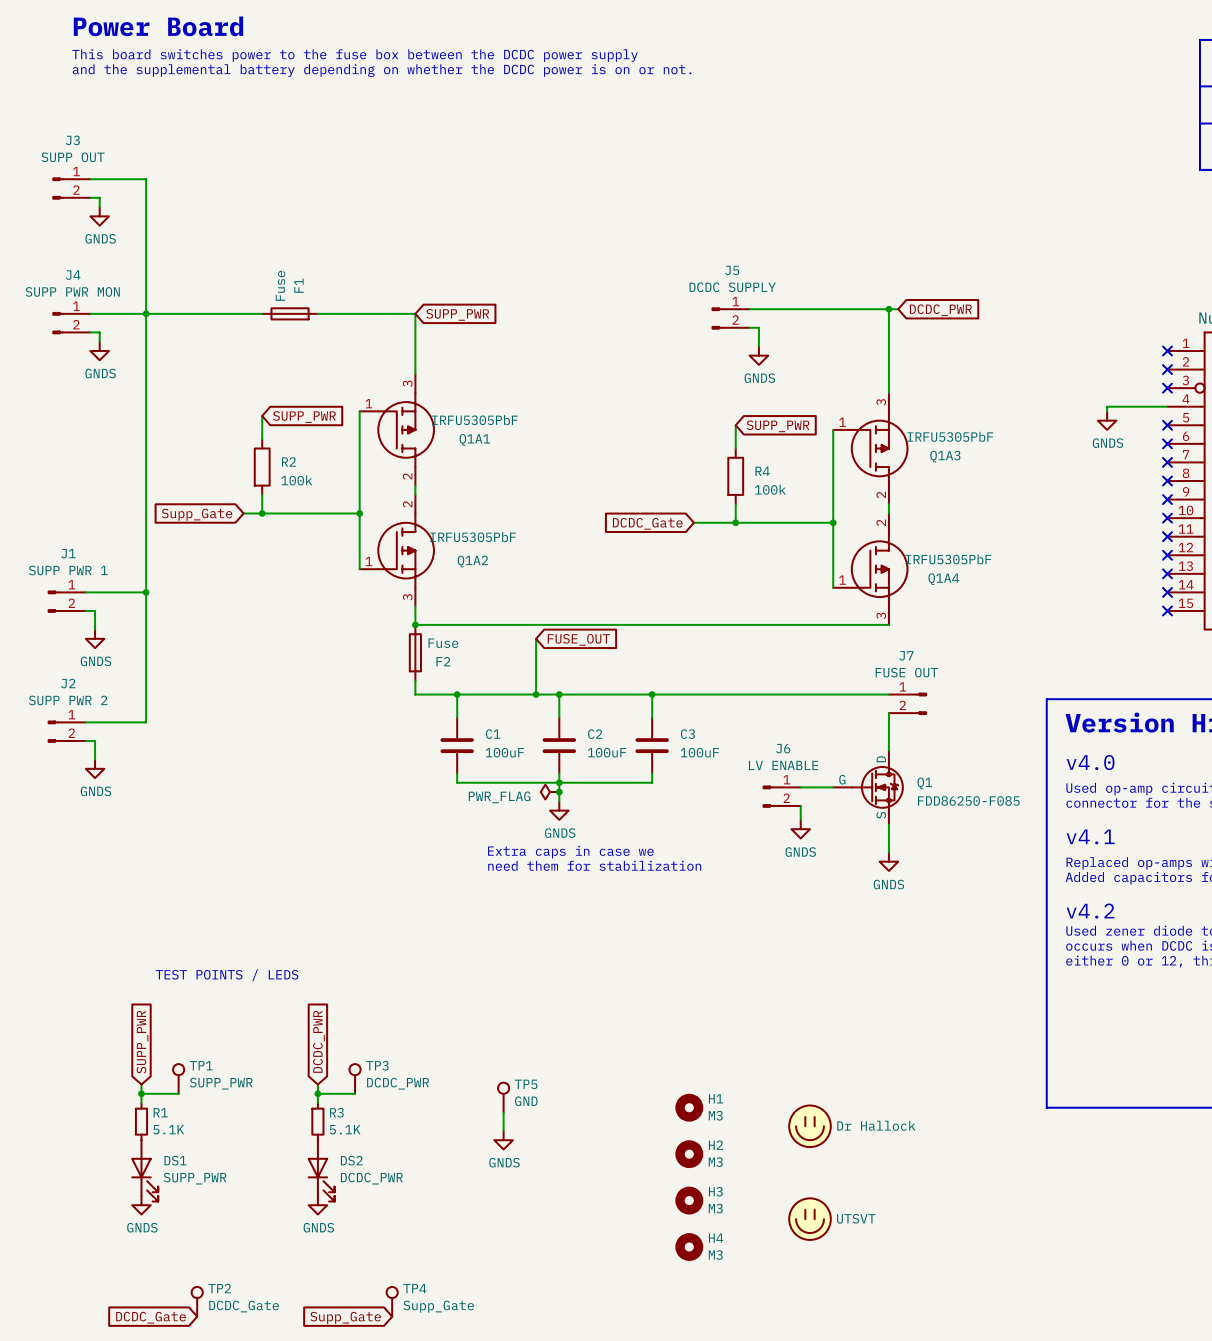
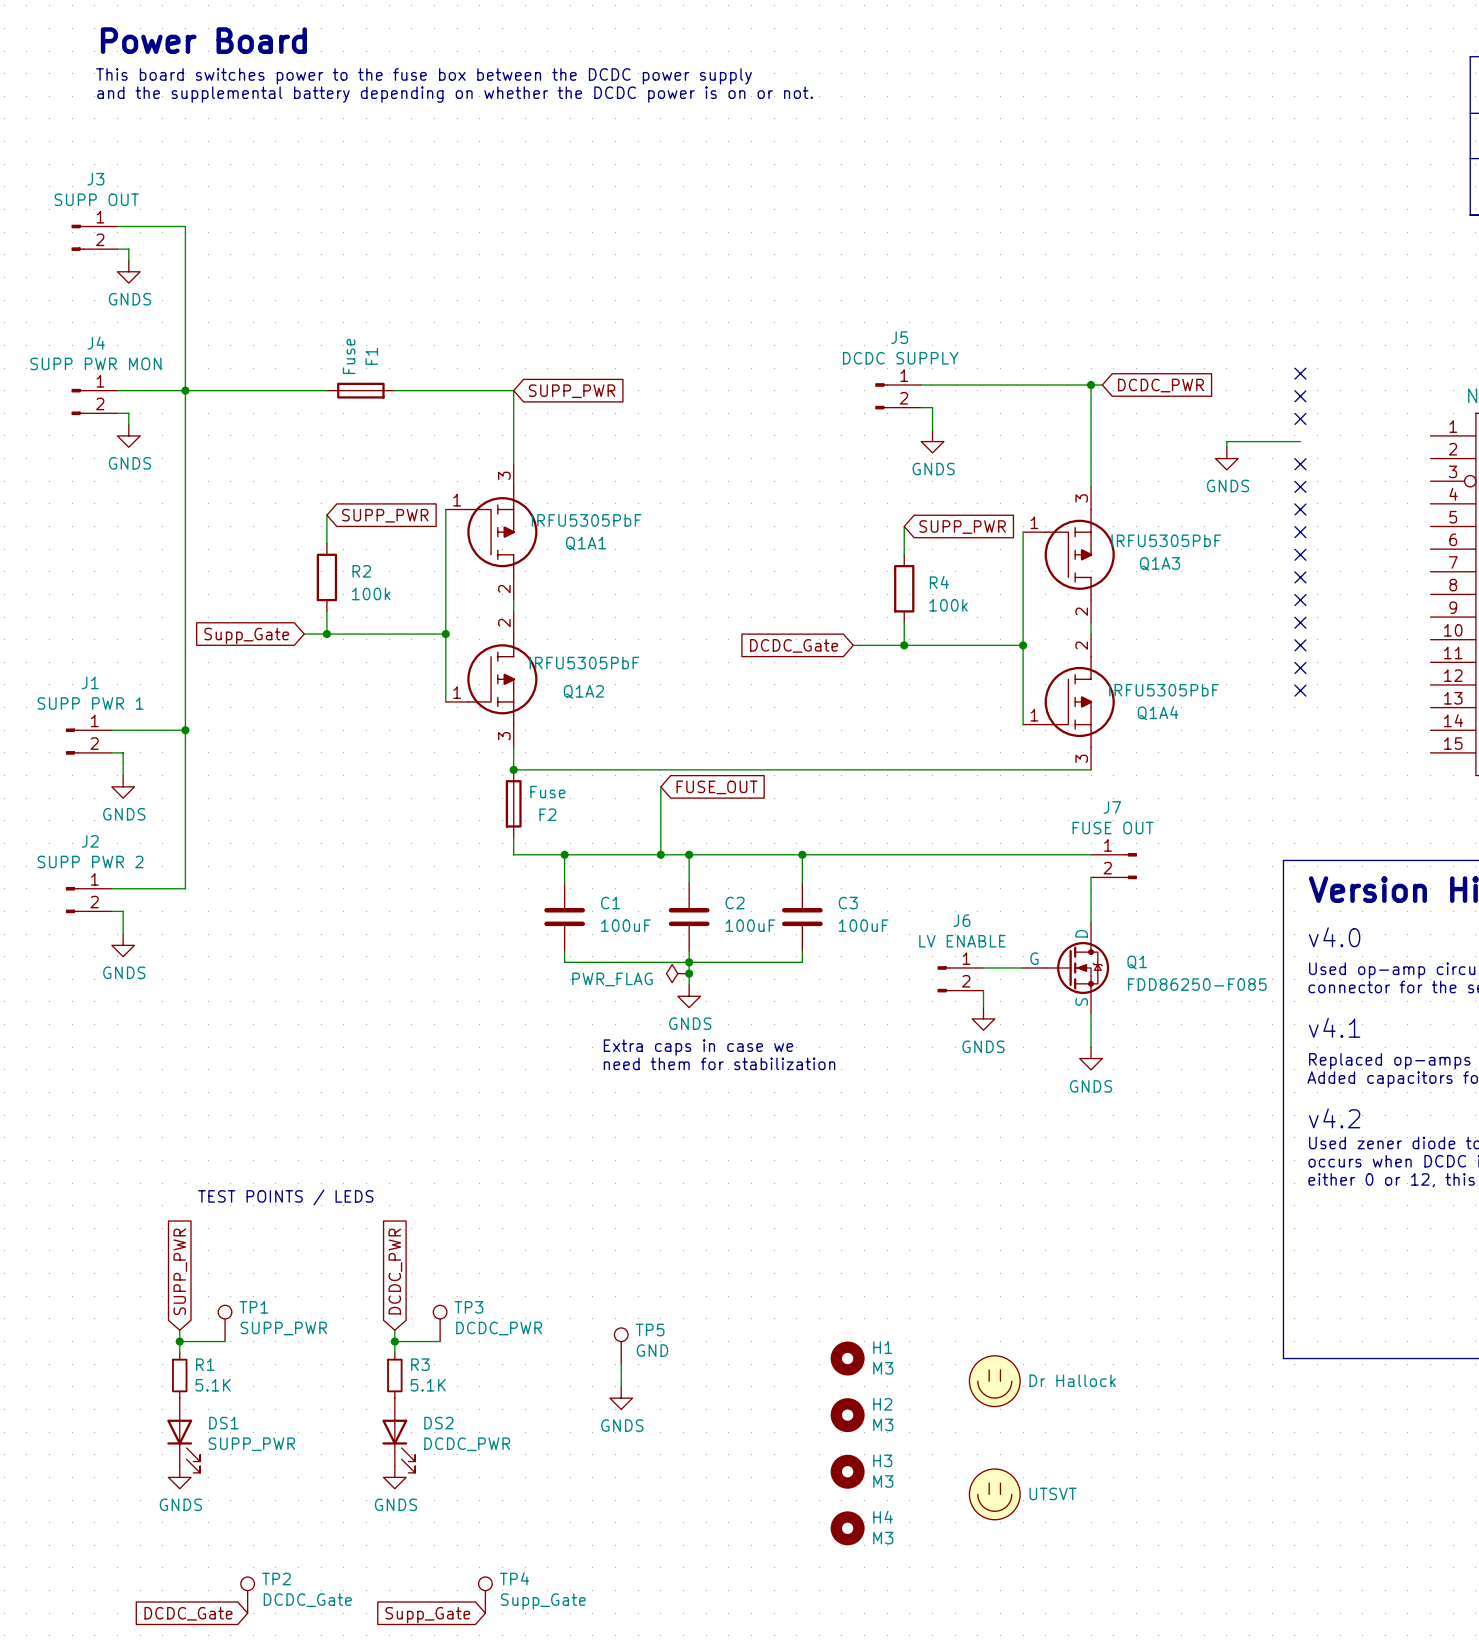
no-connect mark: none -> (1300, 373)
no-connect mark: none -> (1300, 396)
no-connect mark: none -> (1300, 418)
no-connect mark: (1167, 351) -> none
no-connect mark: (1167, 369) -> none
no-connect mark: none -> (1300, 464)
no-connect mark: (1167, 388) -> none
no-connect mark: none -> (1300, 486)
wire: (1167, 406) (1107, 406) (1107, 411) -> (1300, 441) (1226, 441) (1226, 447)
no-connect mark: none -> (1300, 509)
power symbol position: GNDS (1107, 420) -> GNDS (1226, 458)
no-connect mark: (1167, 425) -> none
no-connect mark: none -> (1300, 532)
no-connect mark: (1167, 443) -> none
no-connect mark: none -> (1300, 554)
no-connect mark: (1167, 462) -> none
no-connect mark: none -> (1300, 577)
no-connect mark: (1167, 480) -> none
no-connect mark: none -> (1300, 600)
no-connect mark: (1167, 499) -> none
no-connect mark: none -> (1300, 622)
no-connect mark: (1167, 518) -> none
no-connect mark: none -> (1300, 645)
no-connect mark: (1167, 536) -> none
no-connect mark: none -> (1300, 668)
no-connect mark: (1167, 555) -> none
no-connect mark: none -> (1300, 690)
no-connect mark: (1167, 573) -> none
no-connect mark: (1167, 592) -> none
no-connect mark: (1167, 610) -> none

